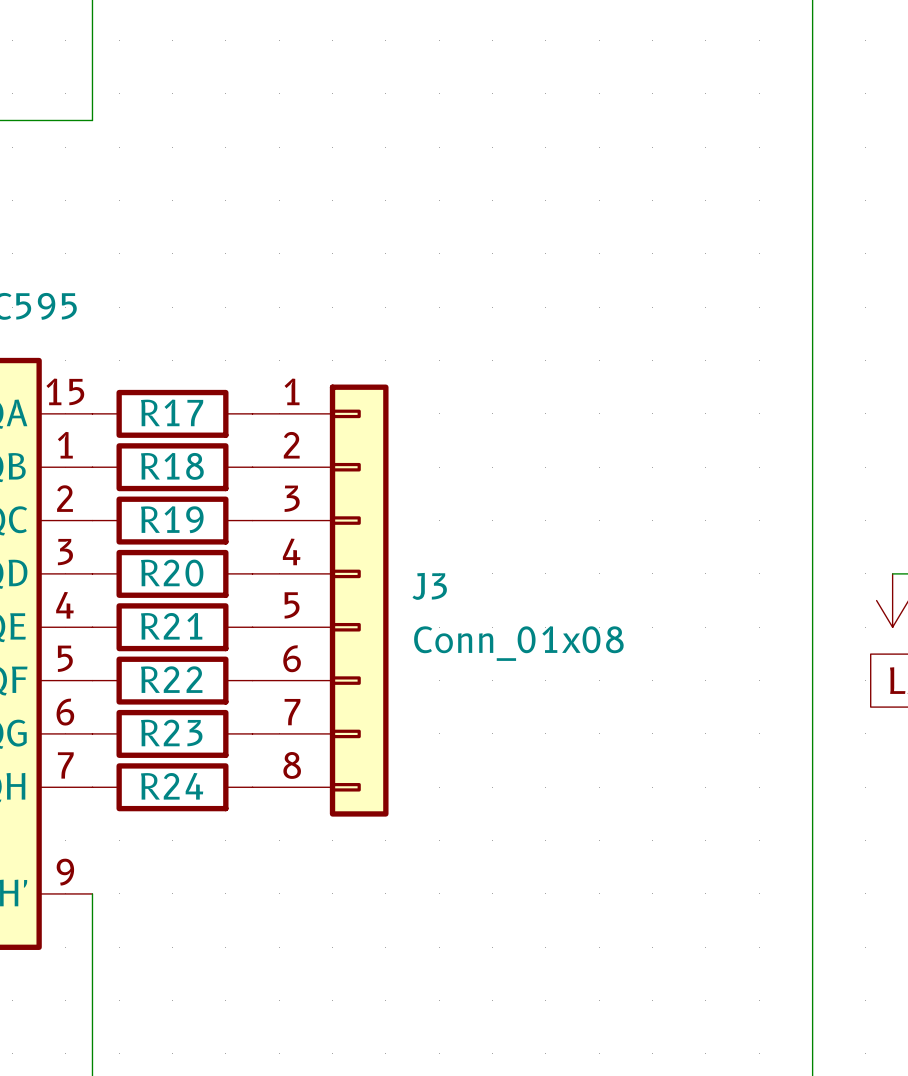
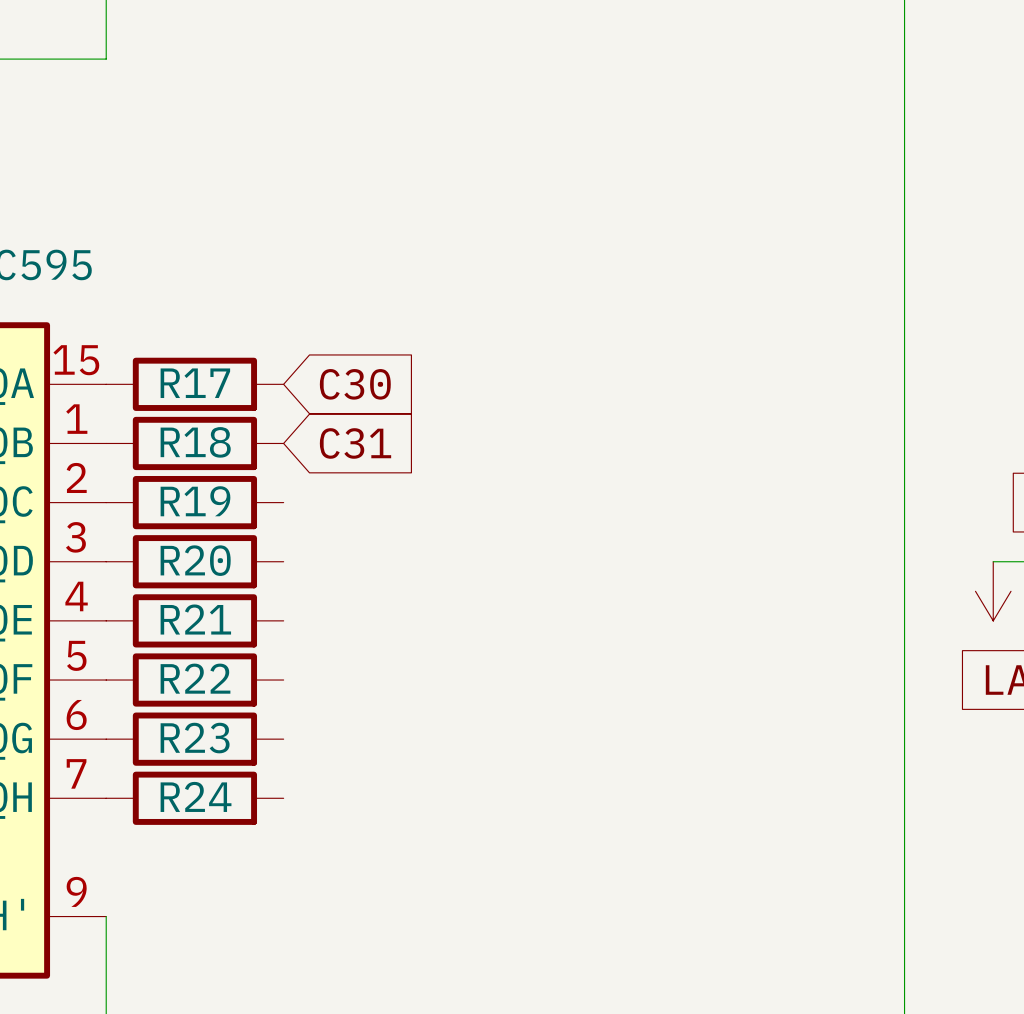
global label: none -> C30 (355, 384)
global label: none -> C31 (355, 443)
J3: Conn_01x08 (320, 600) -> none

